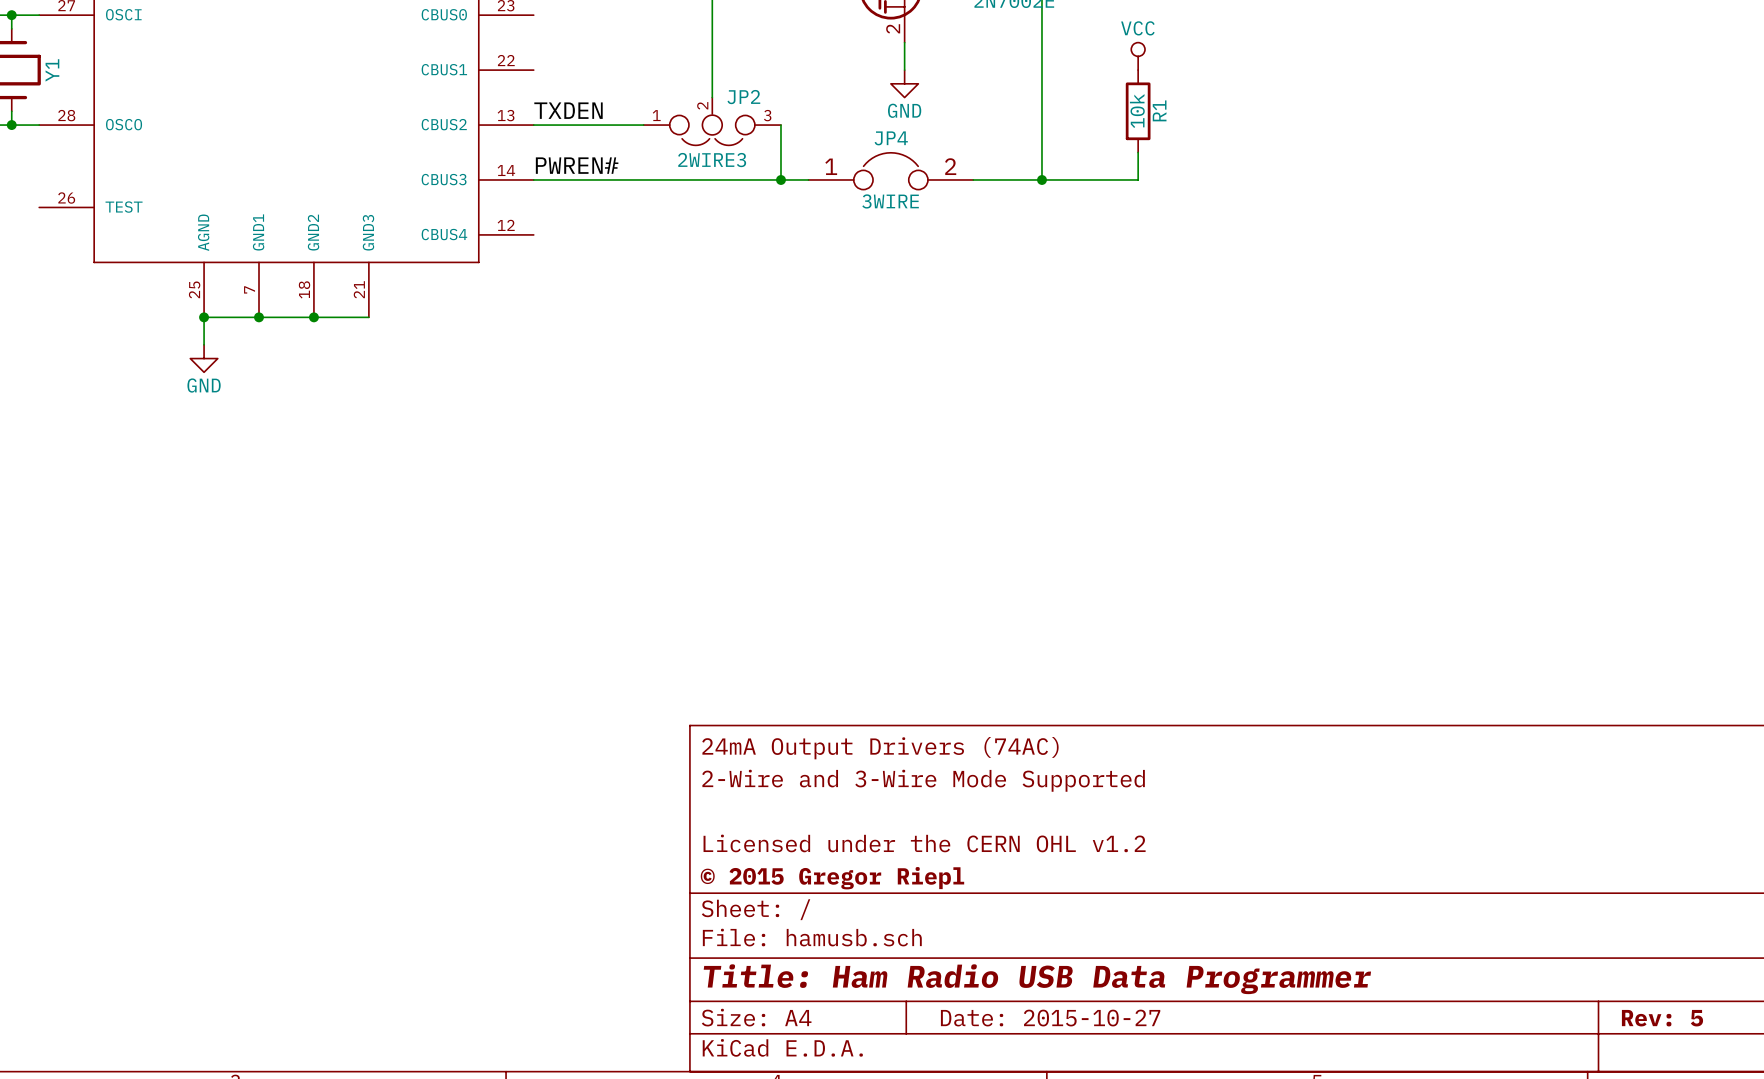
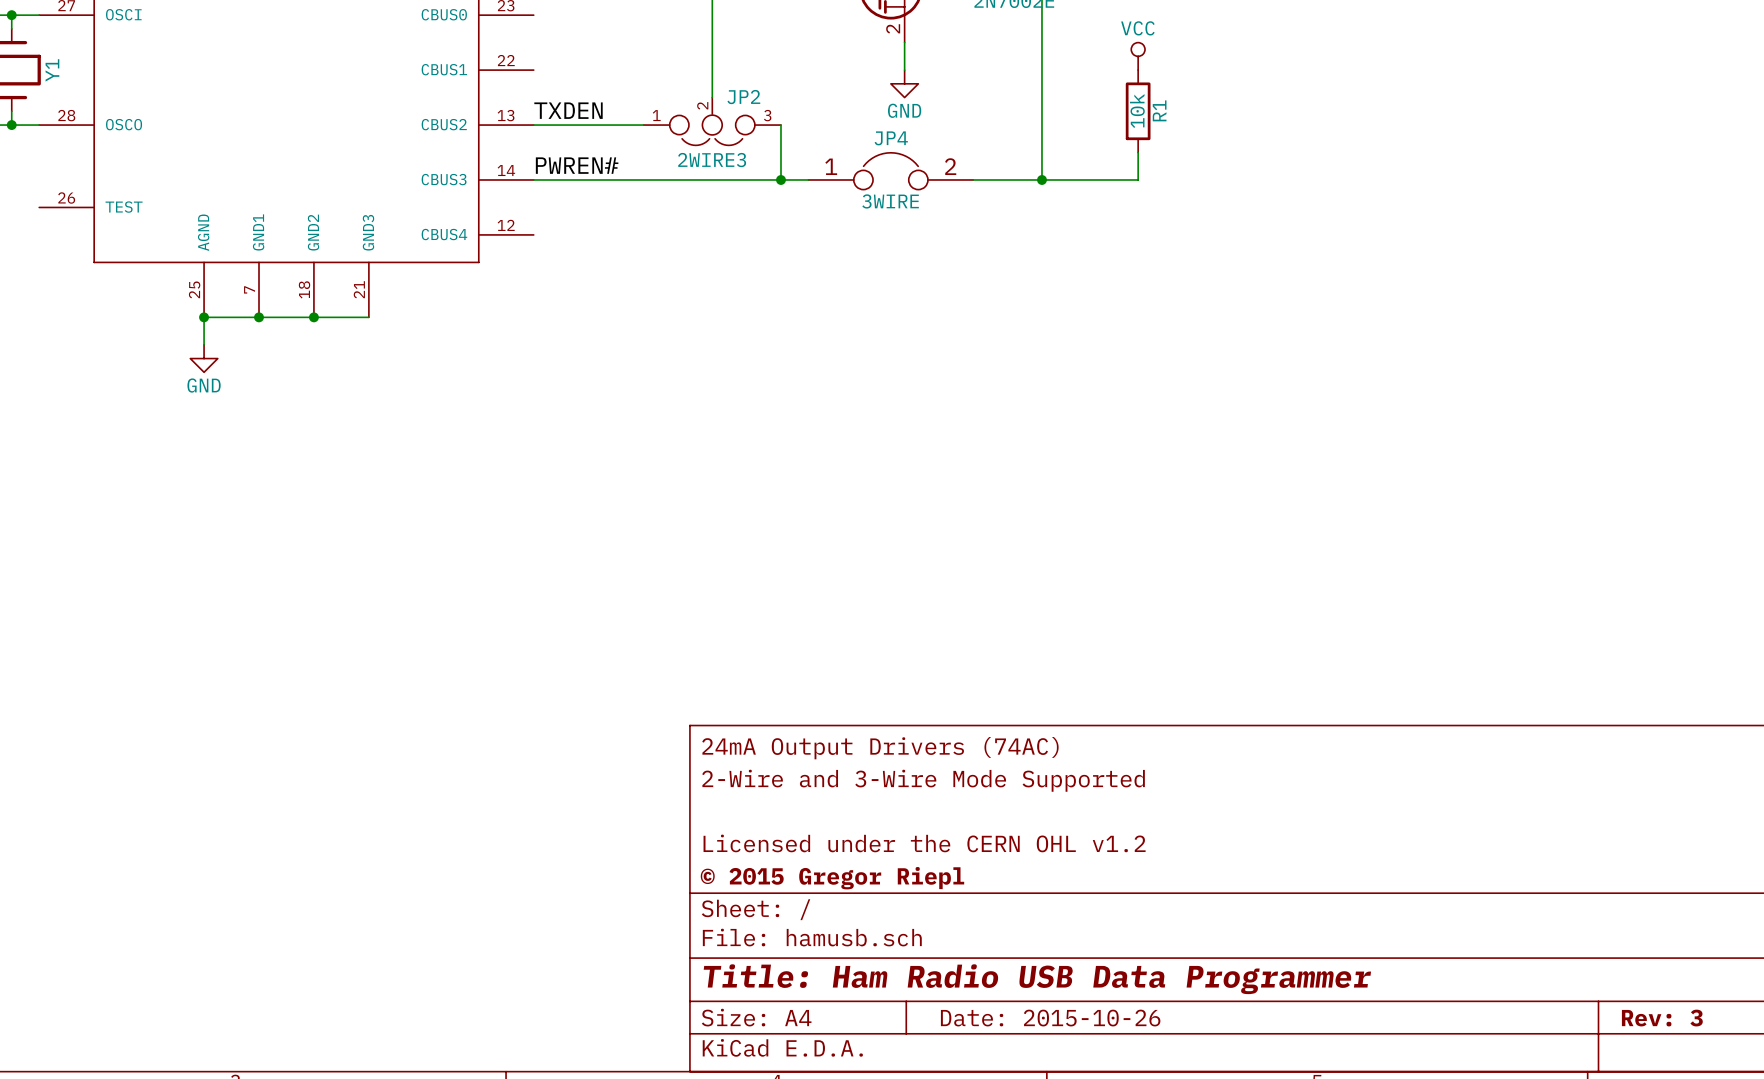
title block: Date: 2015-10-27 (1050, 1018) -> Date: 2015-10-26 (1050, 1018)
title block: Rev: 5 (1662, 1018) -> Rev: 3 (1662, 1018)

